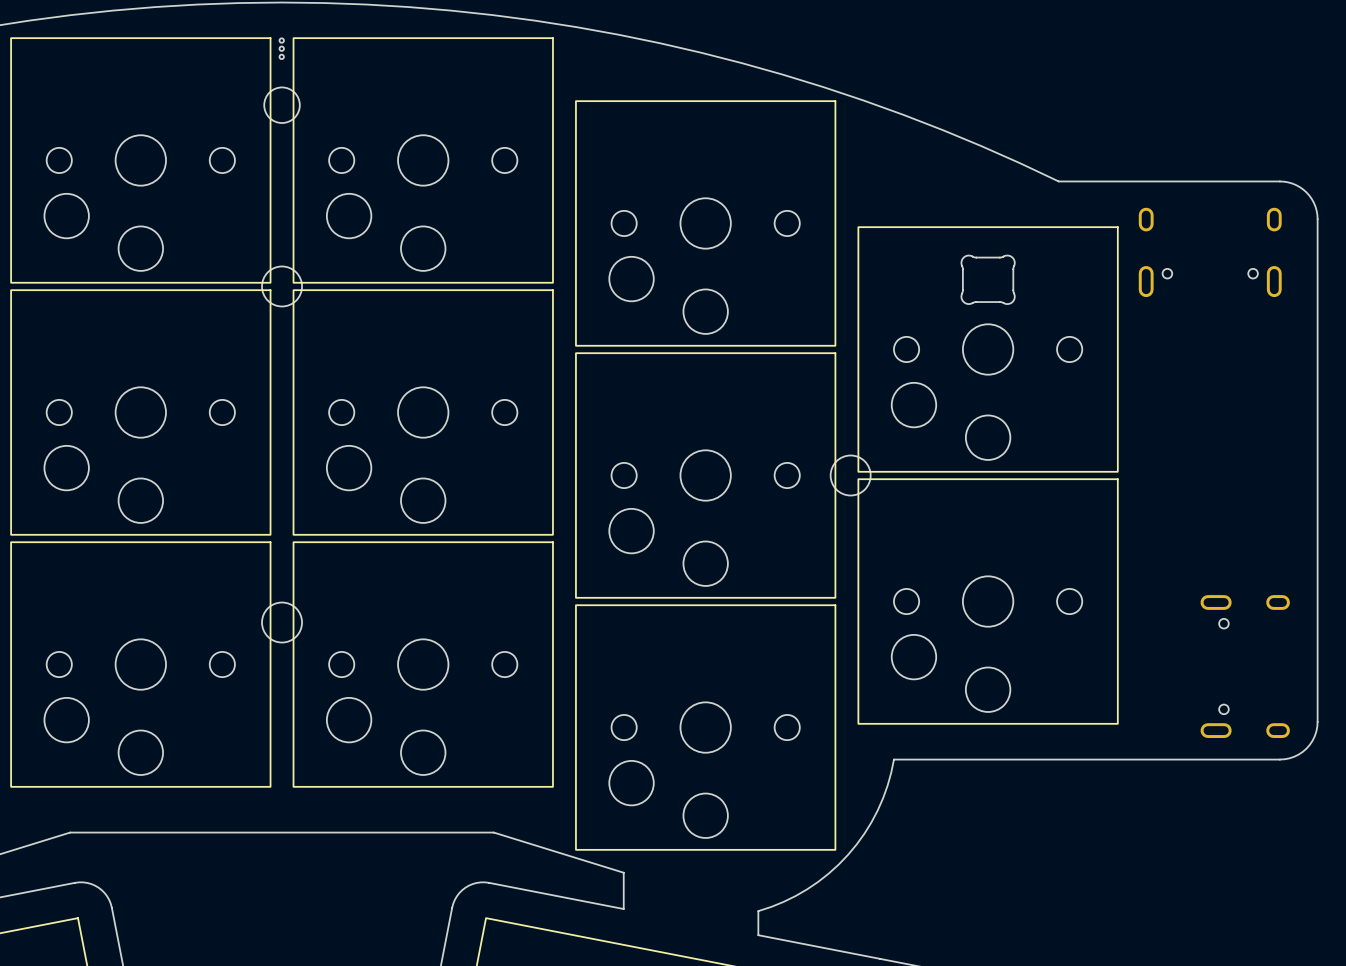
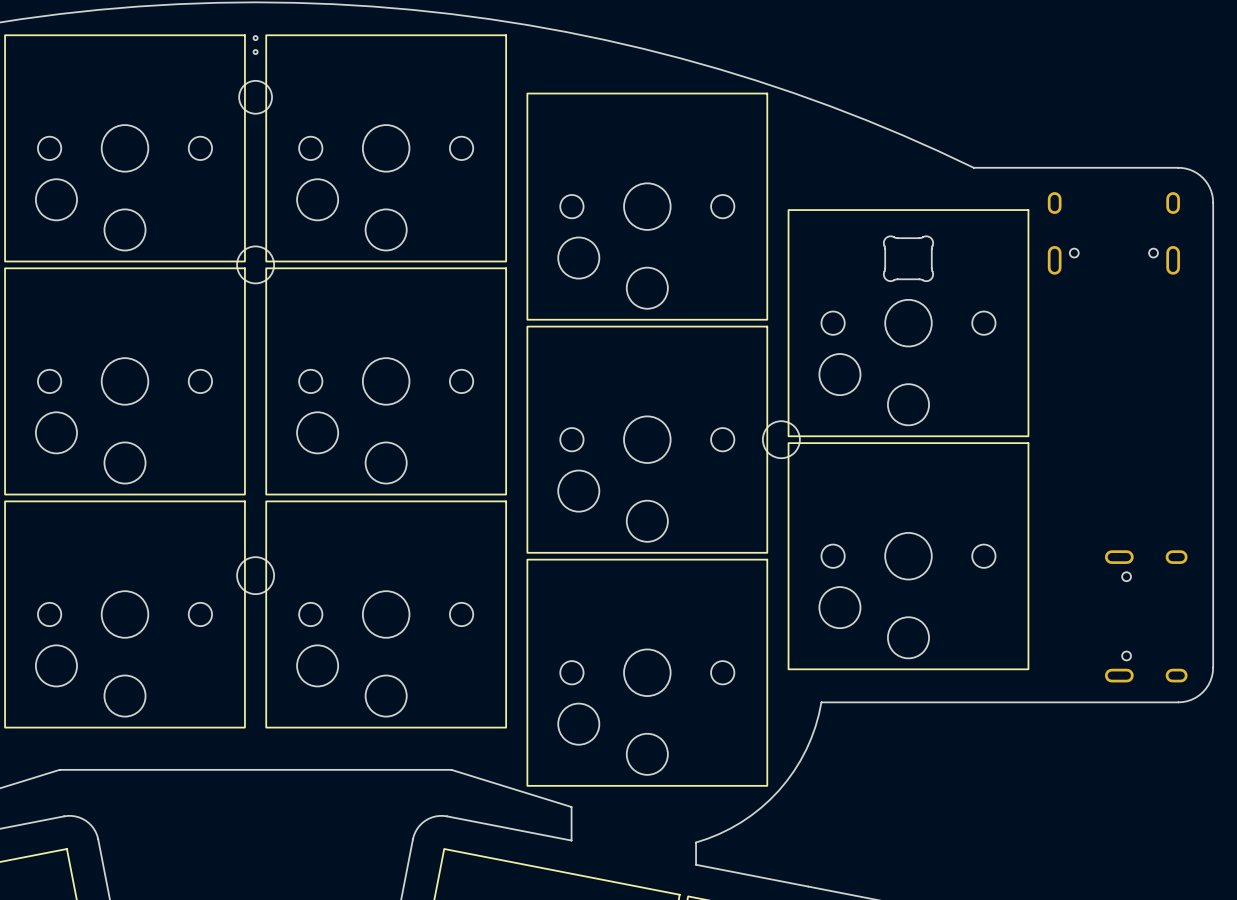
part footprint: [279, 38, 284, 60] -> [253, 36, 258, 55]

